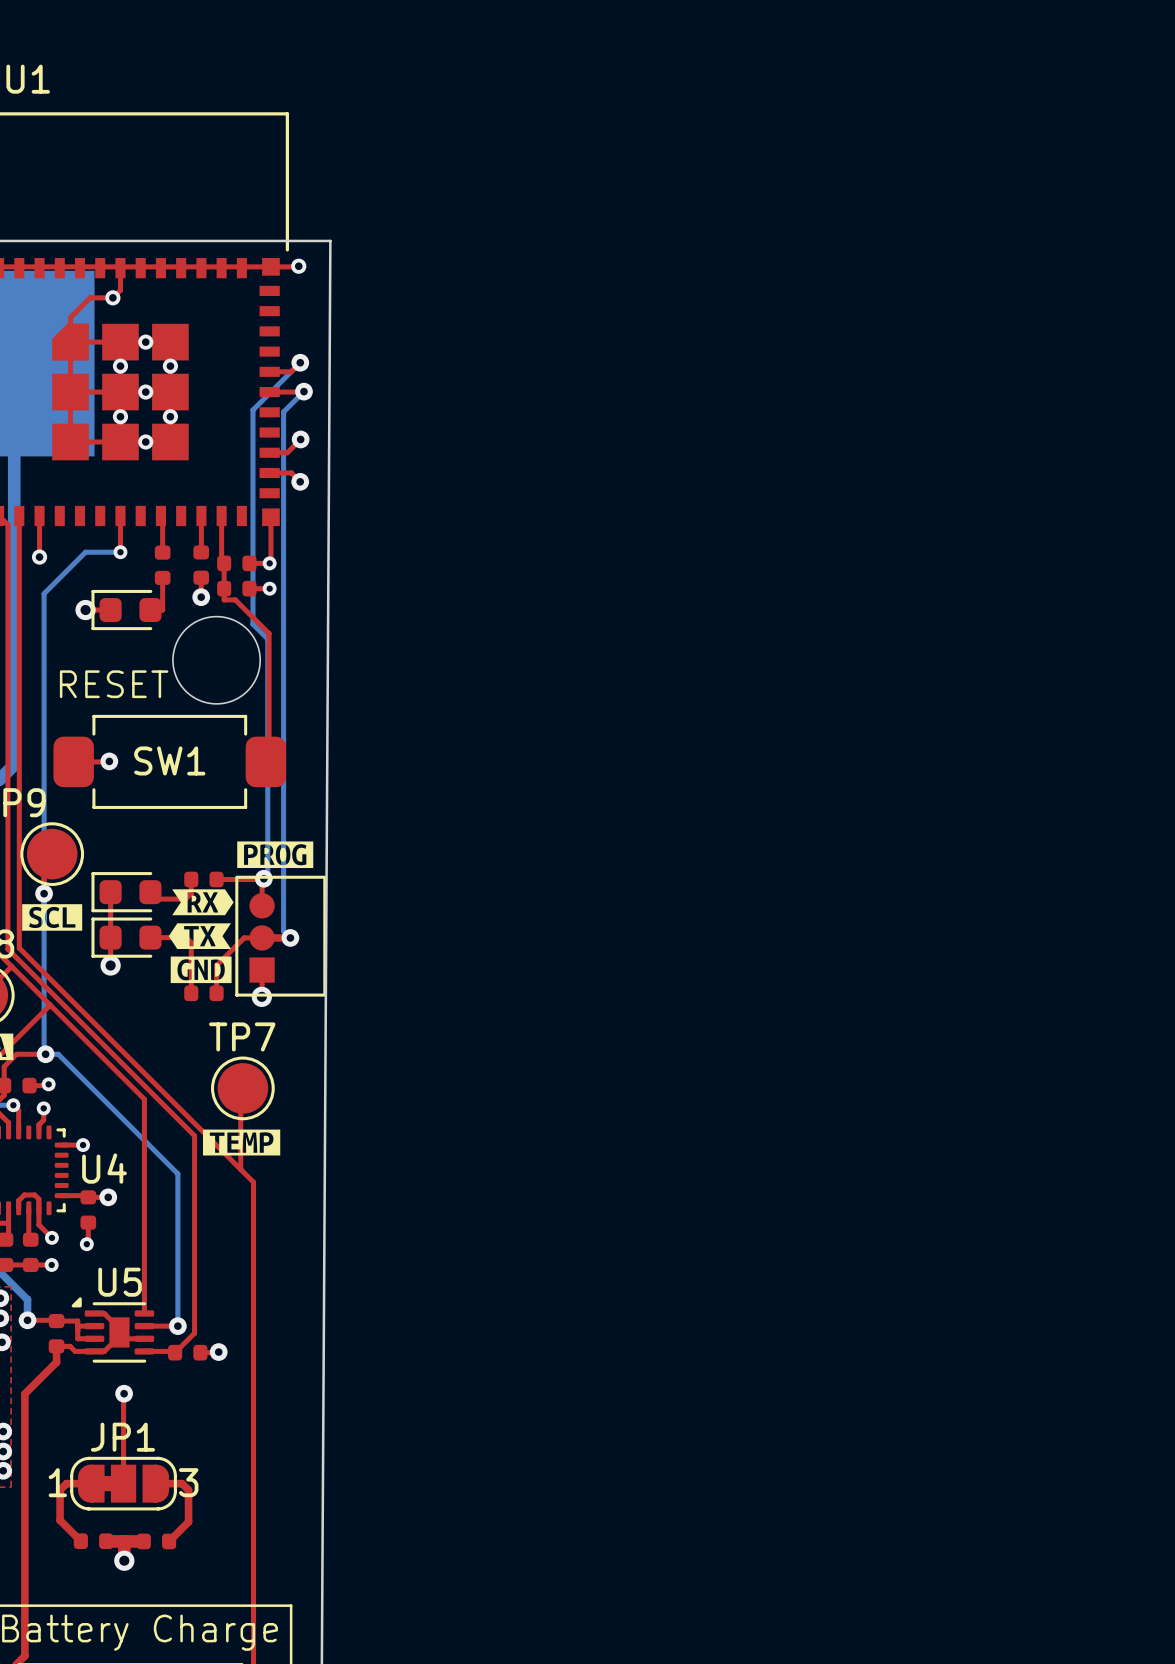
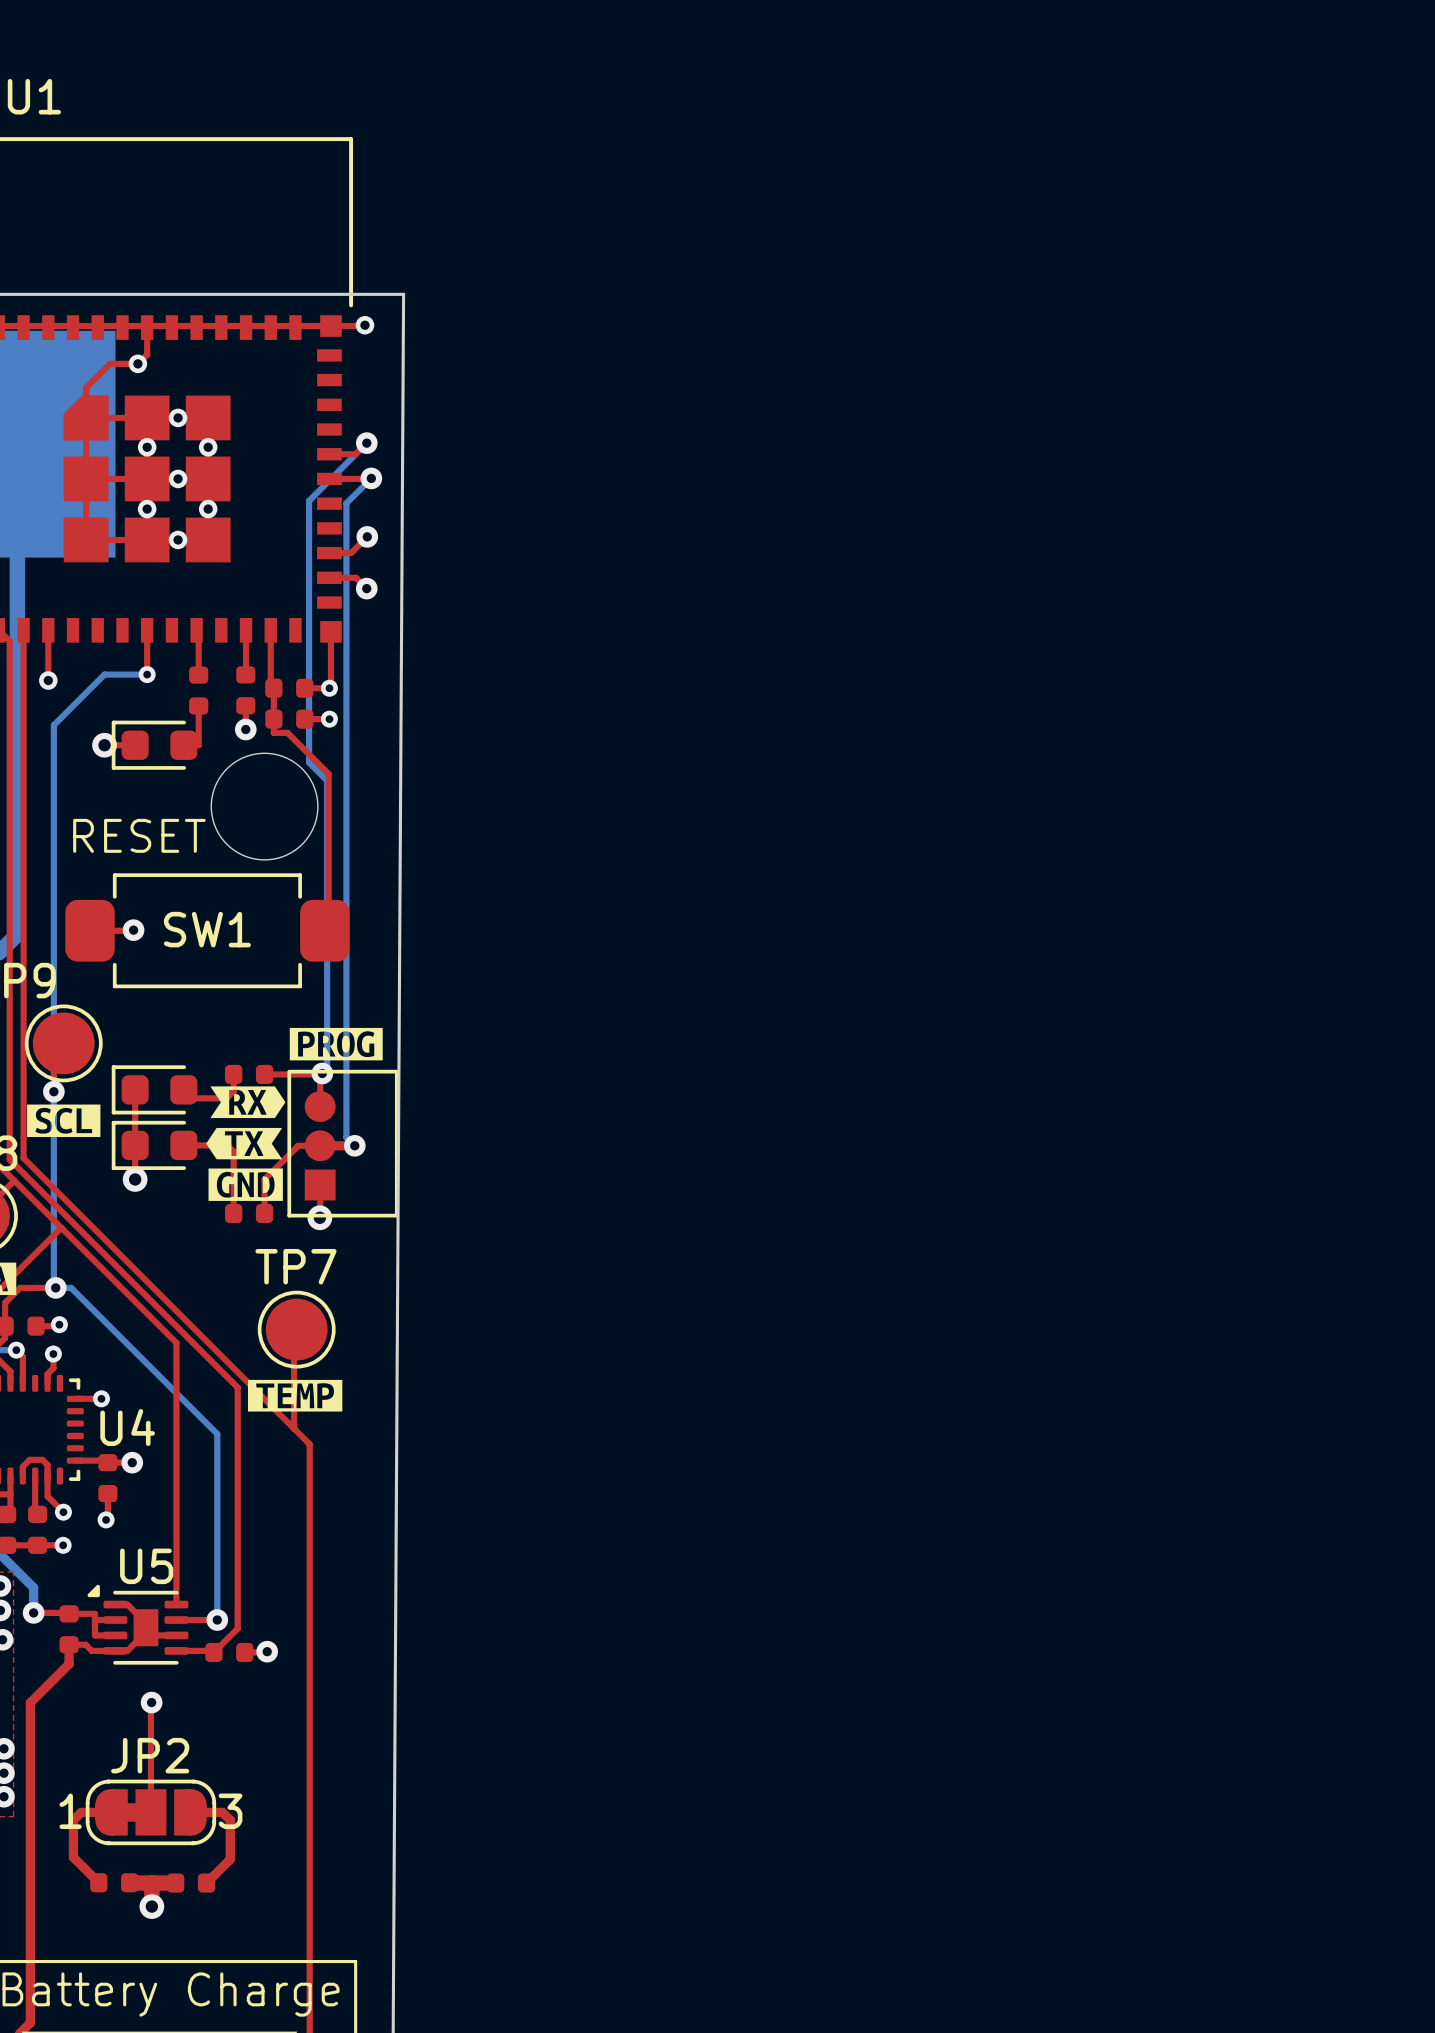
JP1 name: JP1 (122, 1437) -> JP2 (150, 1755)

